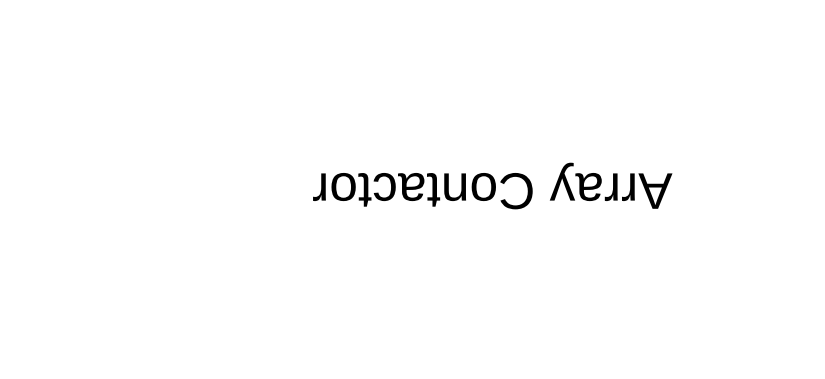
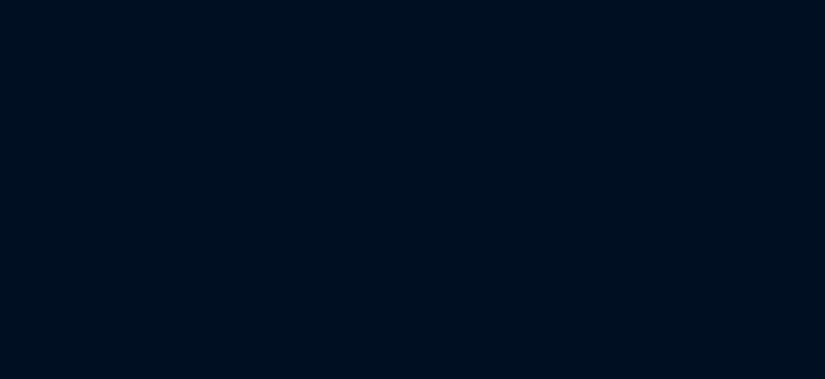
text: Array Contactor (492, 186) -> none

